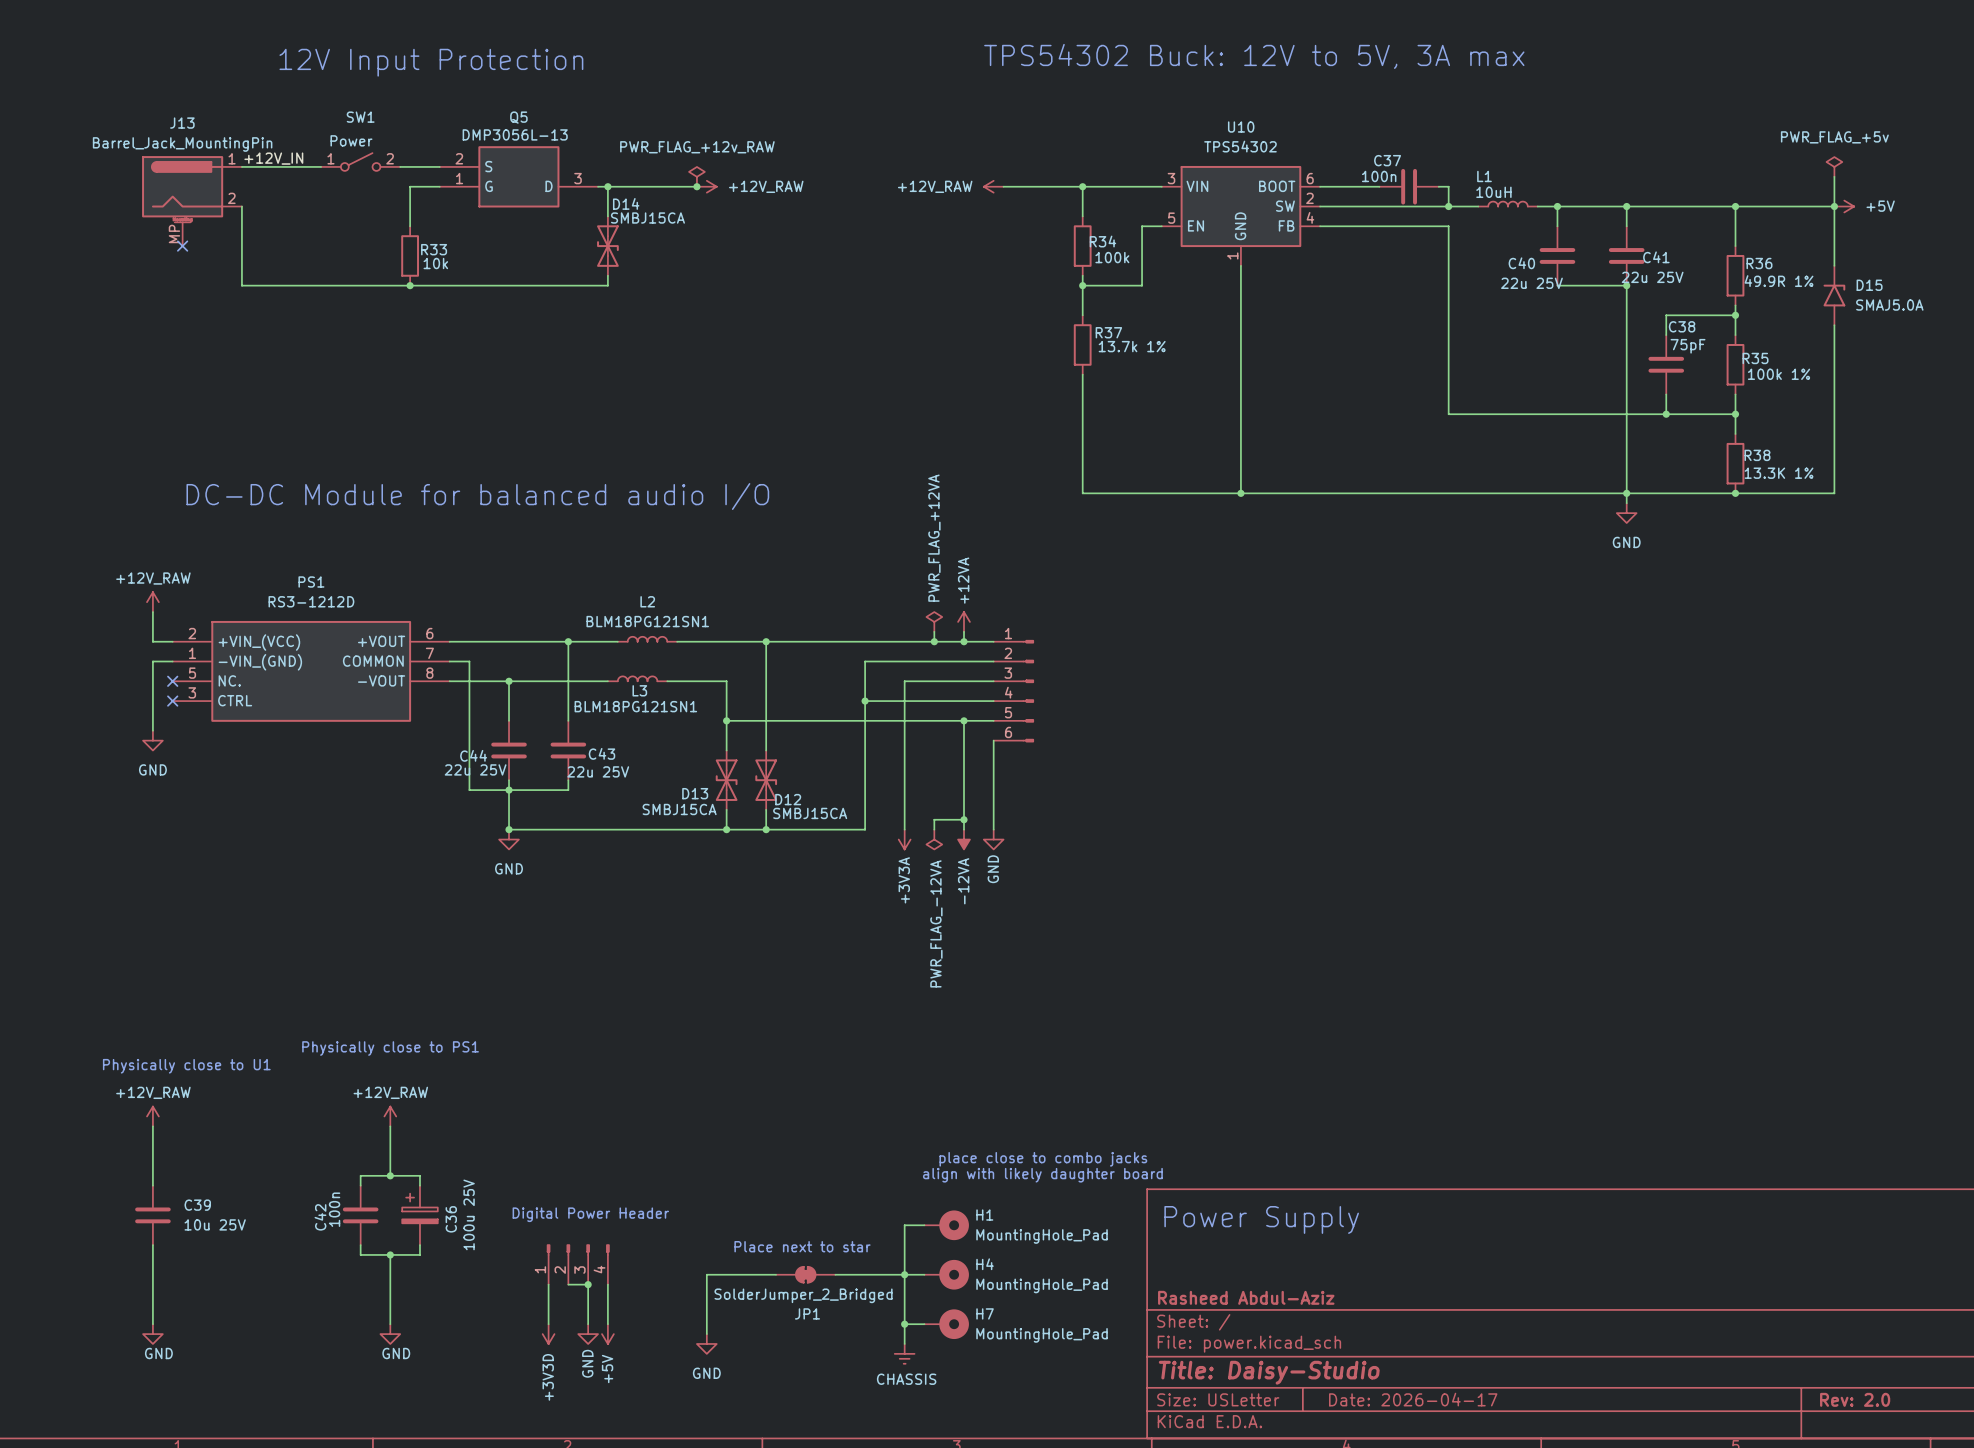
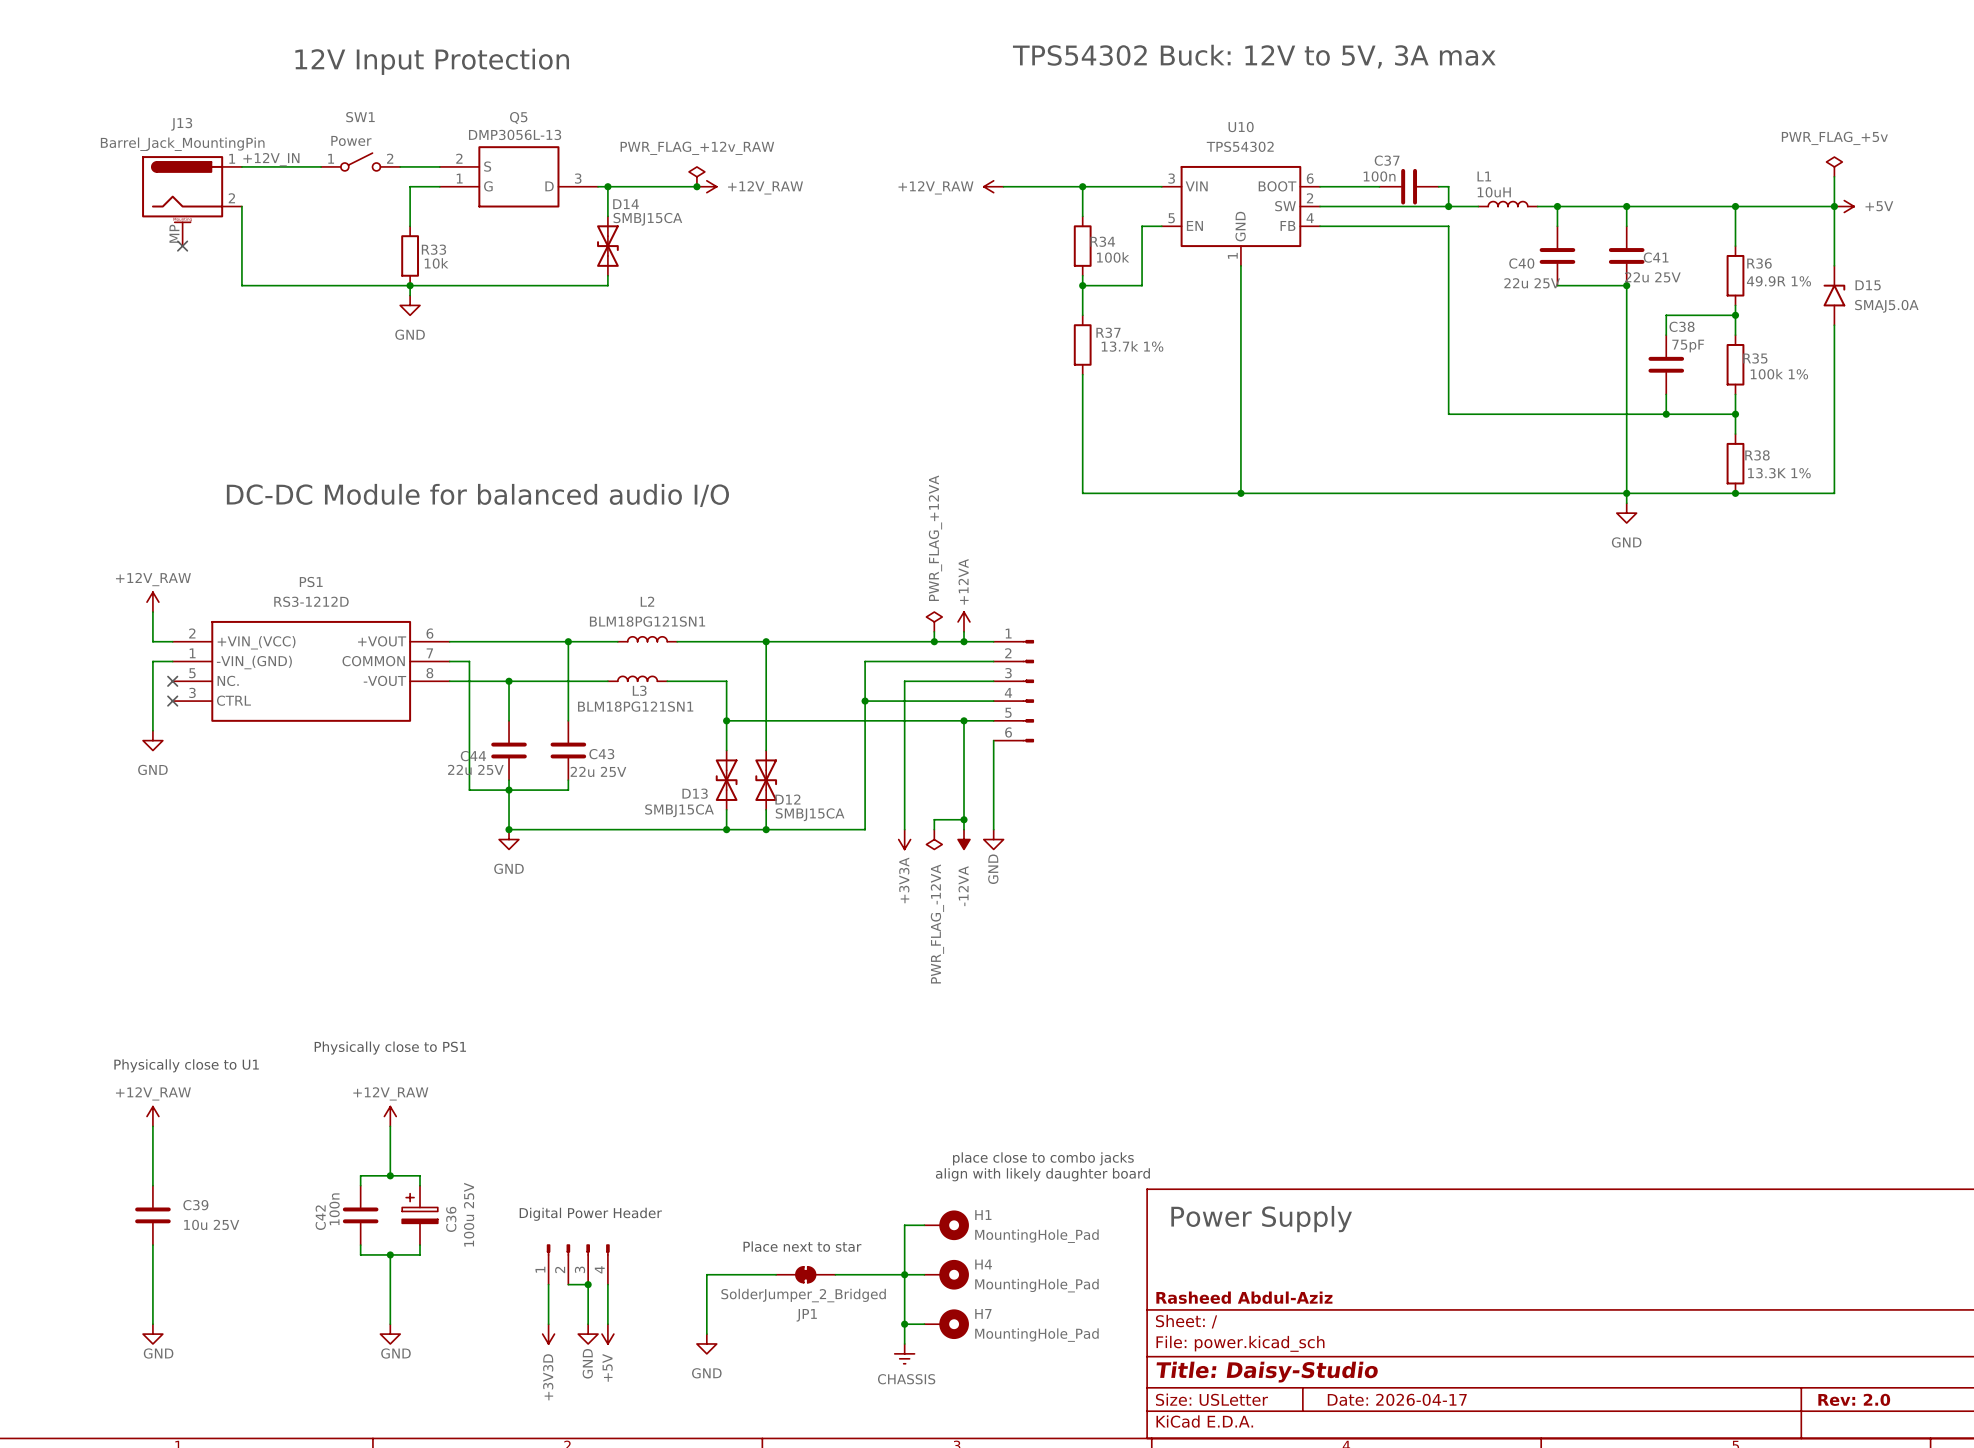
wire: none -> (410, 285) (410, 295)
power symbol: none -> GND (410, 305)

